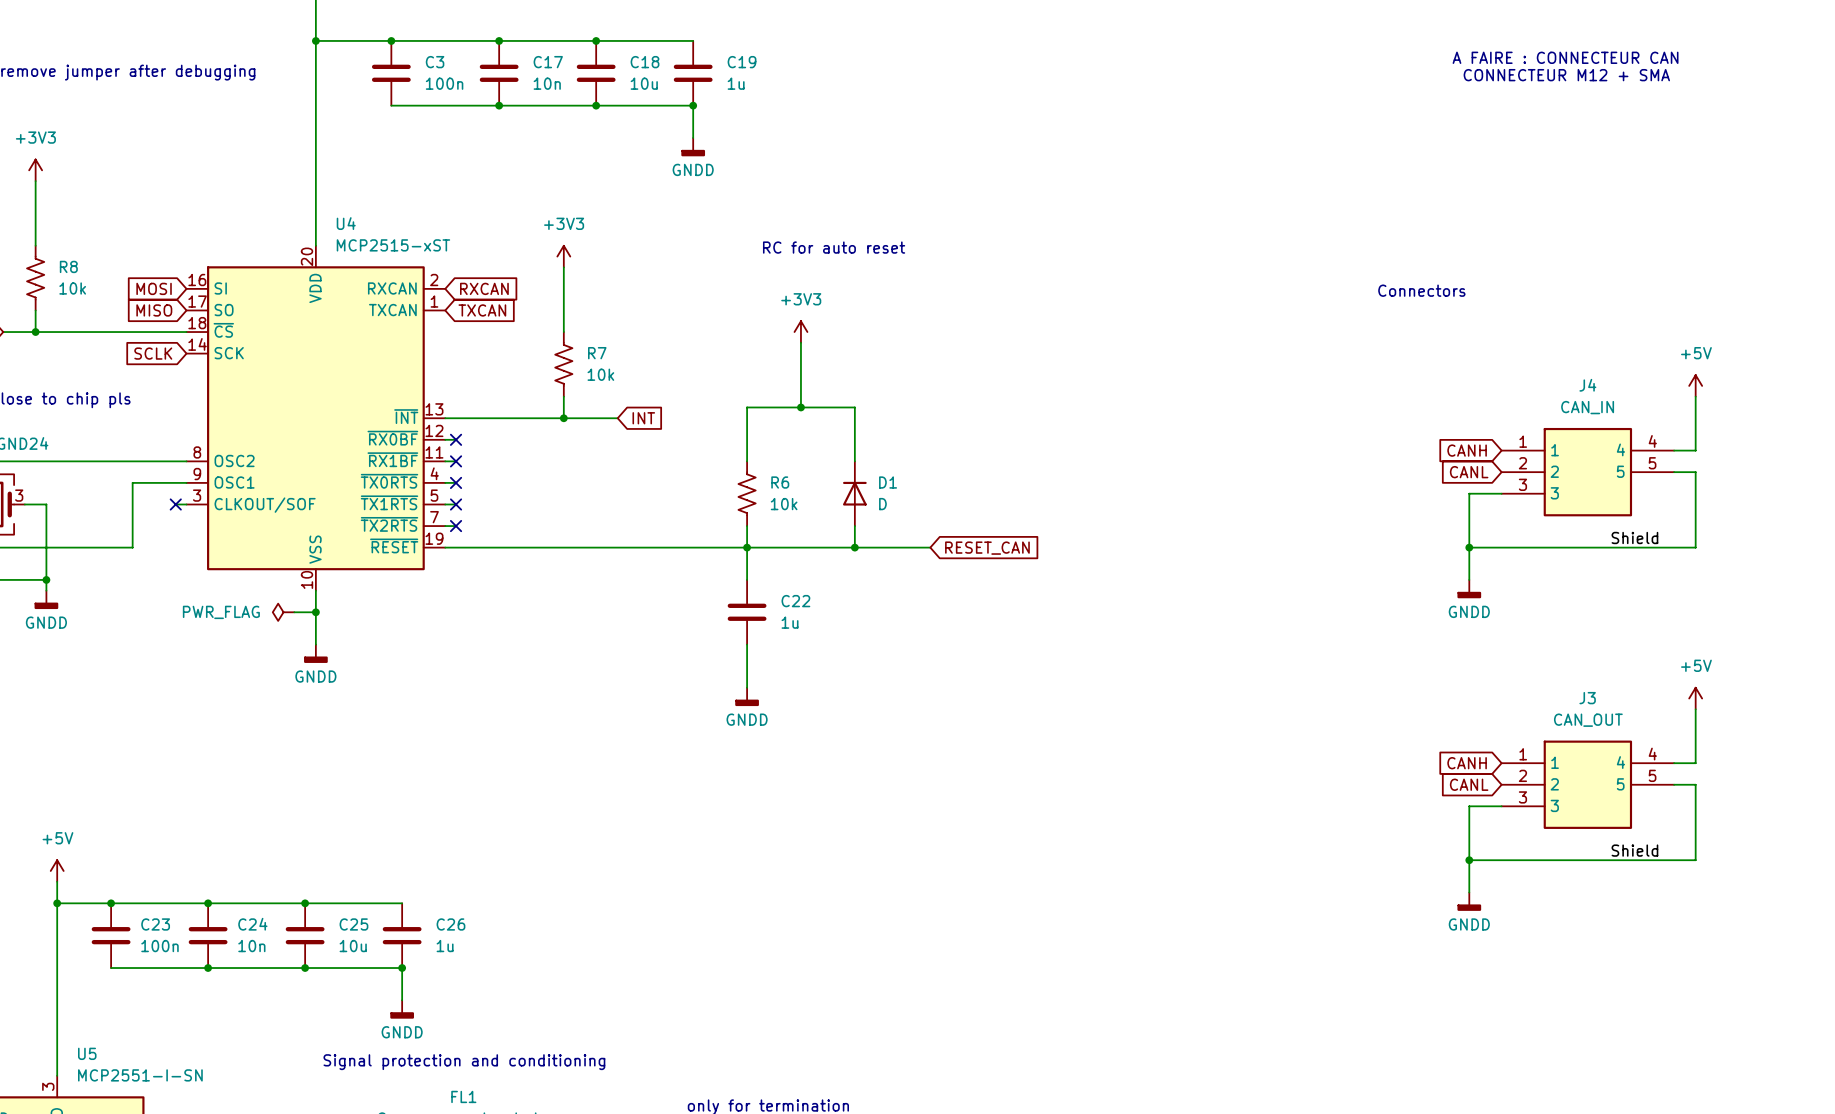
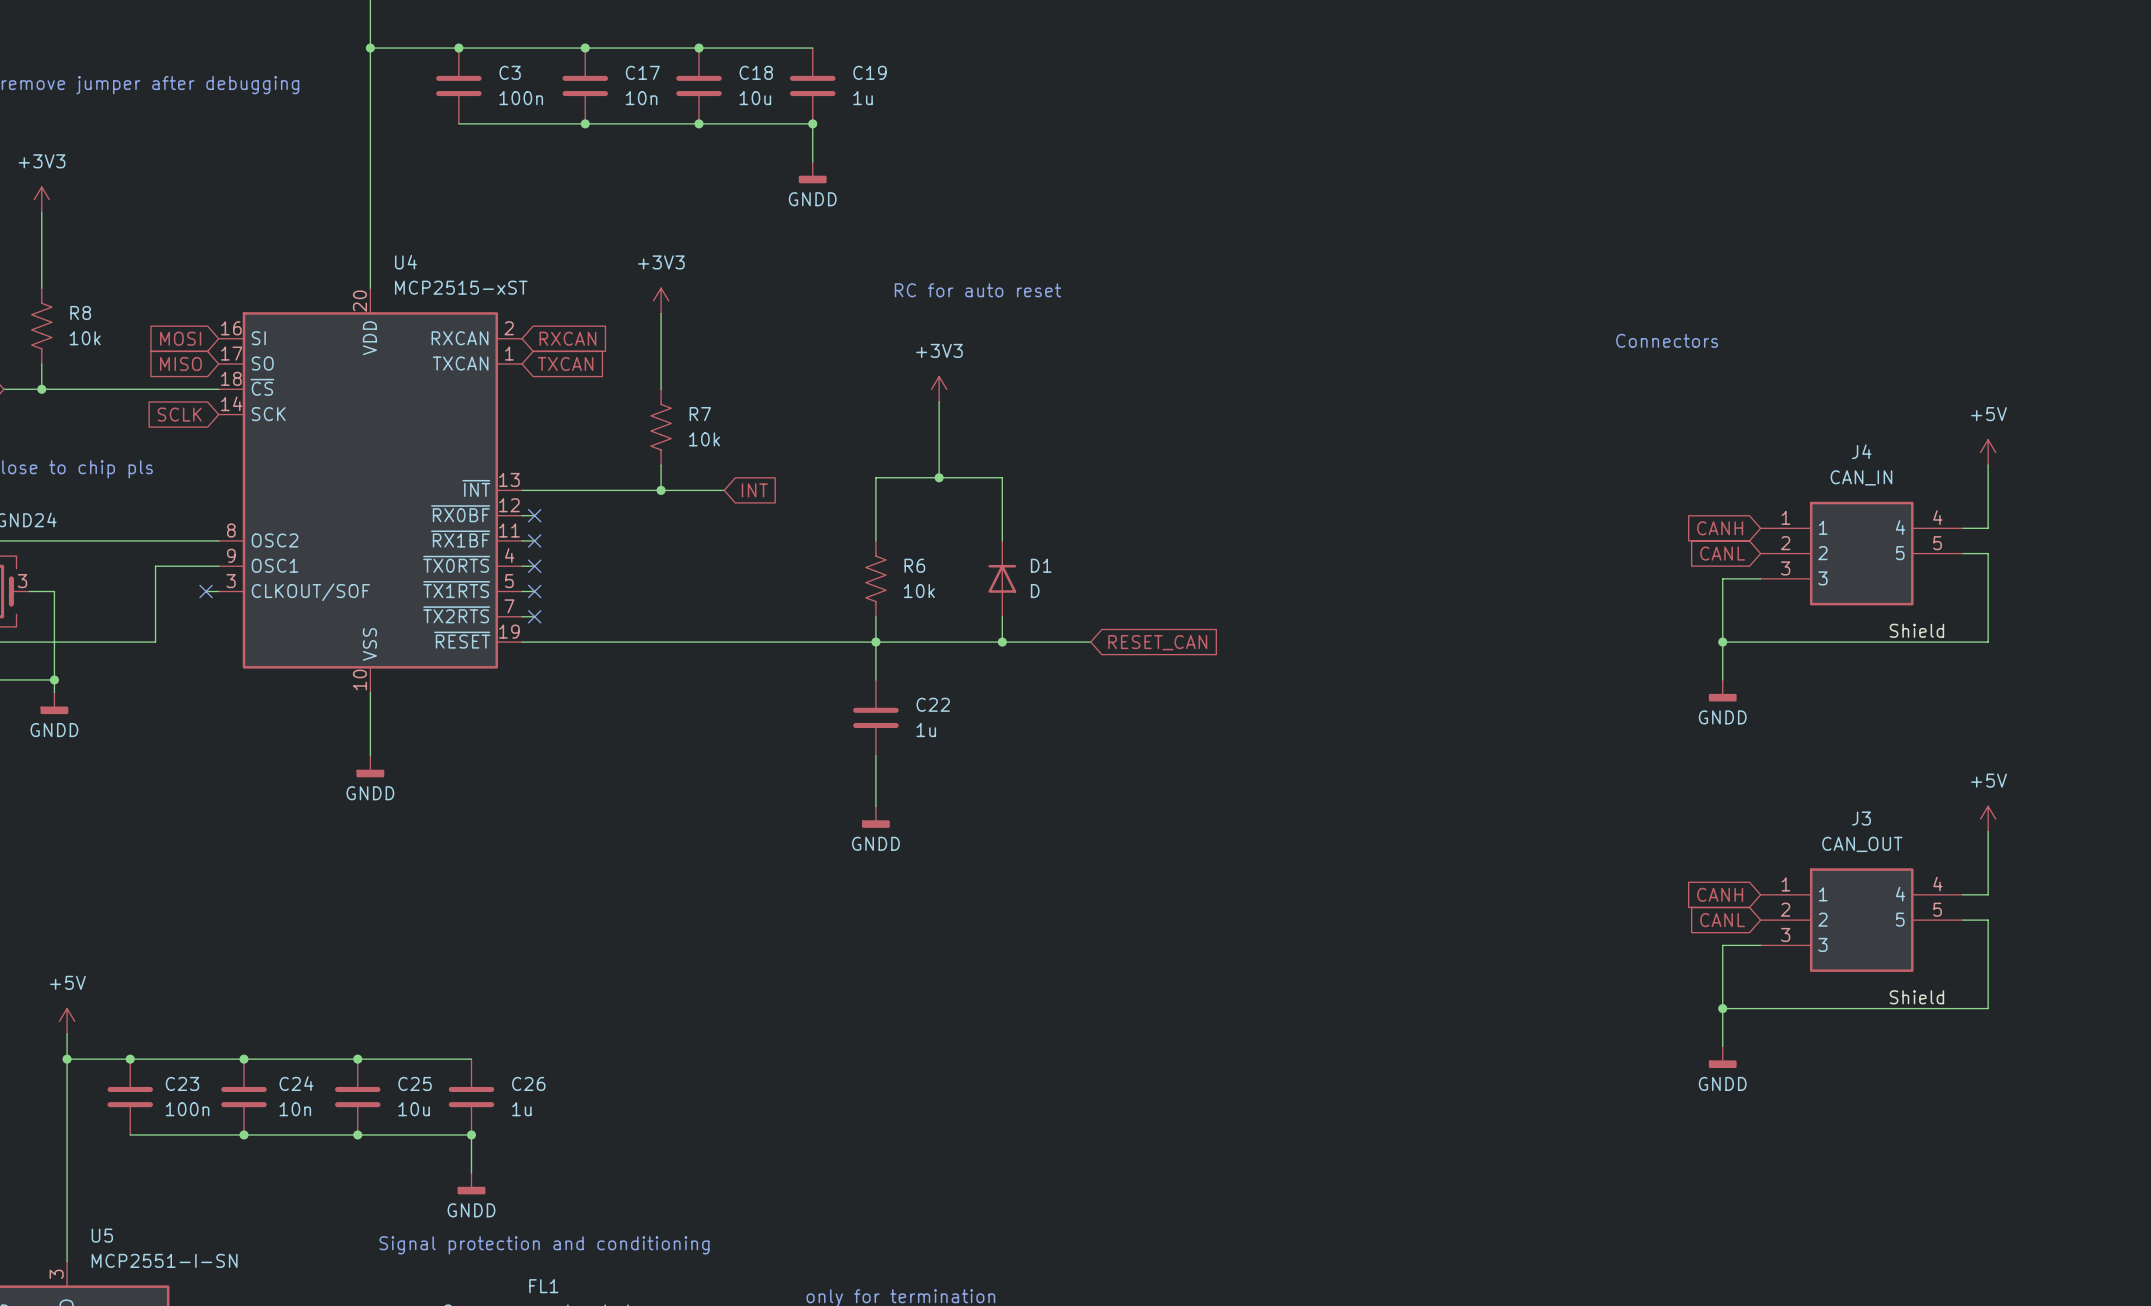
text: A FAIRE : CONNECTEUR CAN (1565, 57) -> none
text: CONNECTEUR M12 + SMA (1566, 75) -> none
power symbol: PWR_FLAG (283, 612) -> none
wire: (294, 612) (315, 612) -> none
junction: (315, 612) -> none

